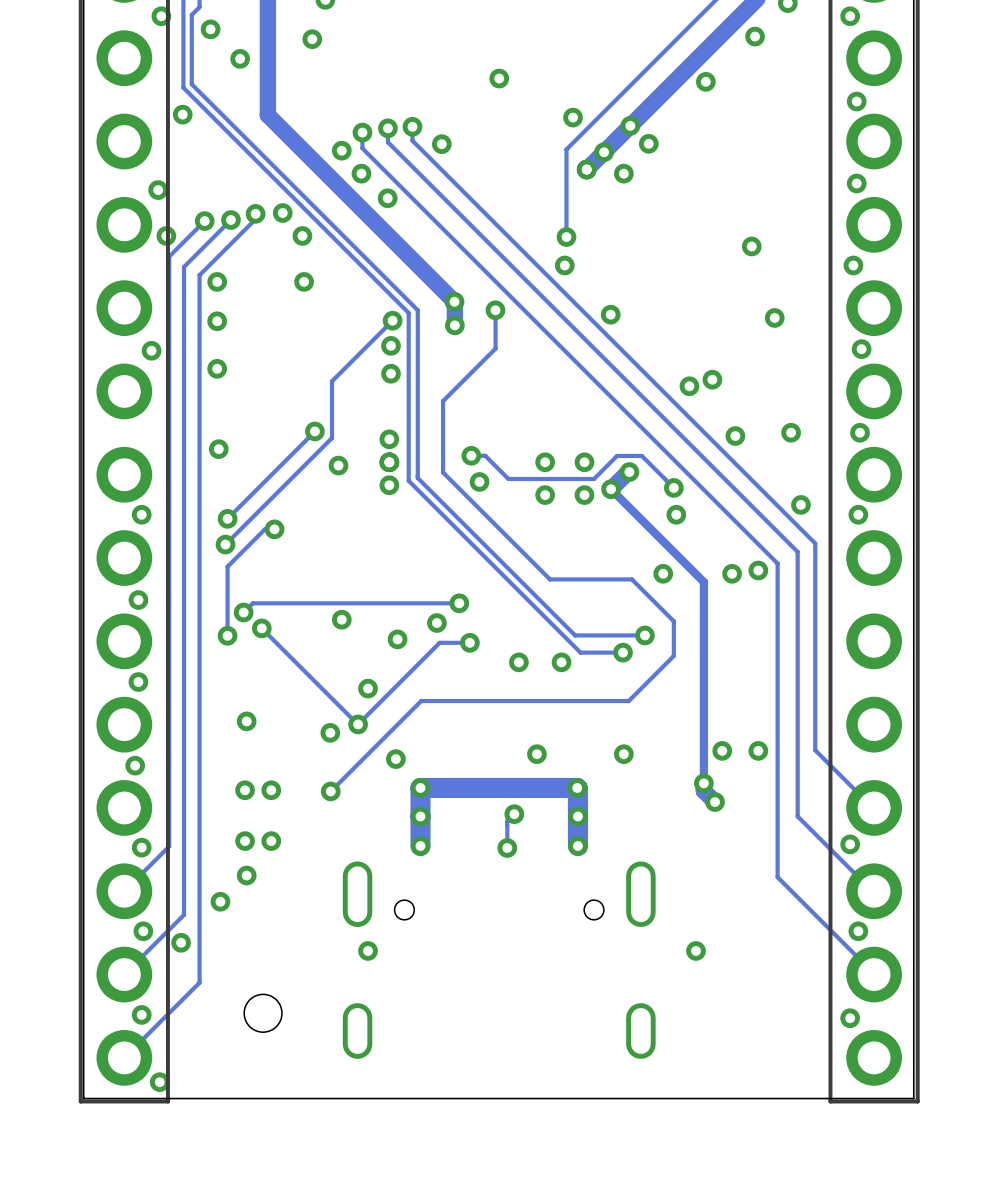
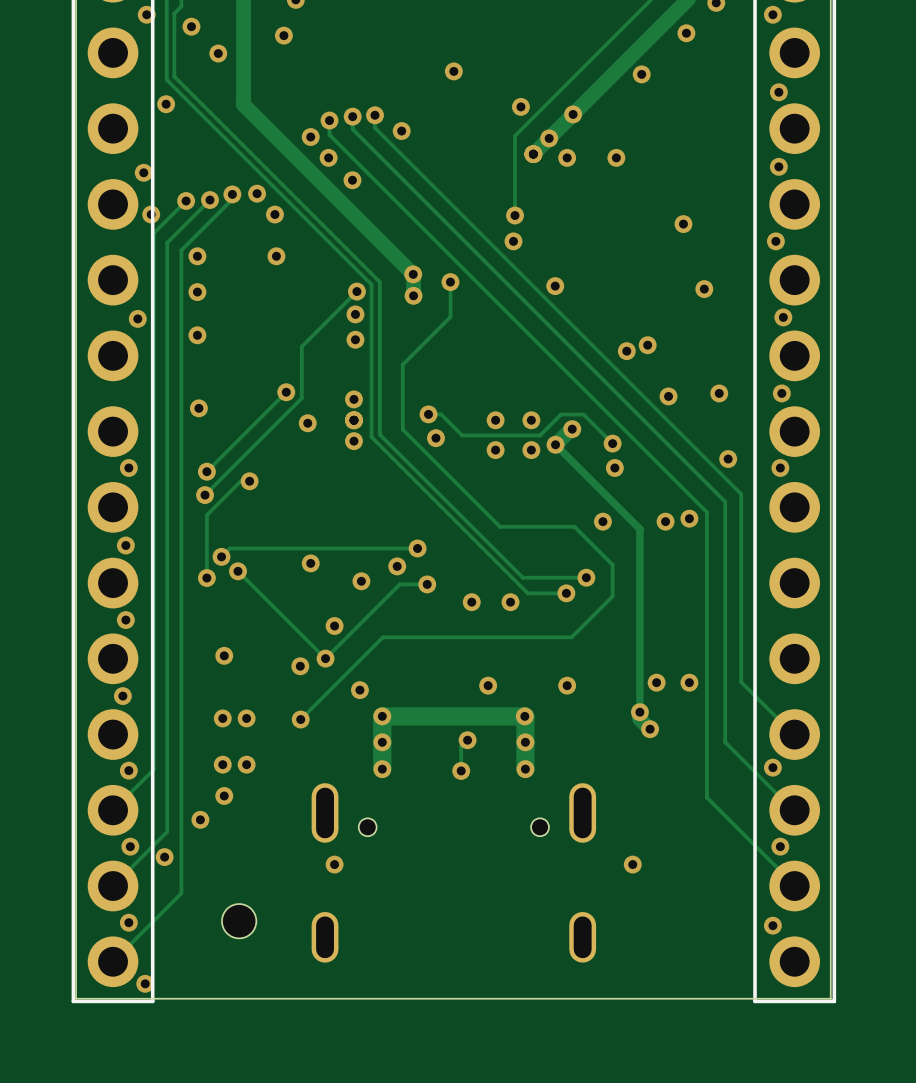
via position: (648, 143) -> (616, 157)

